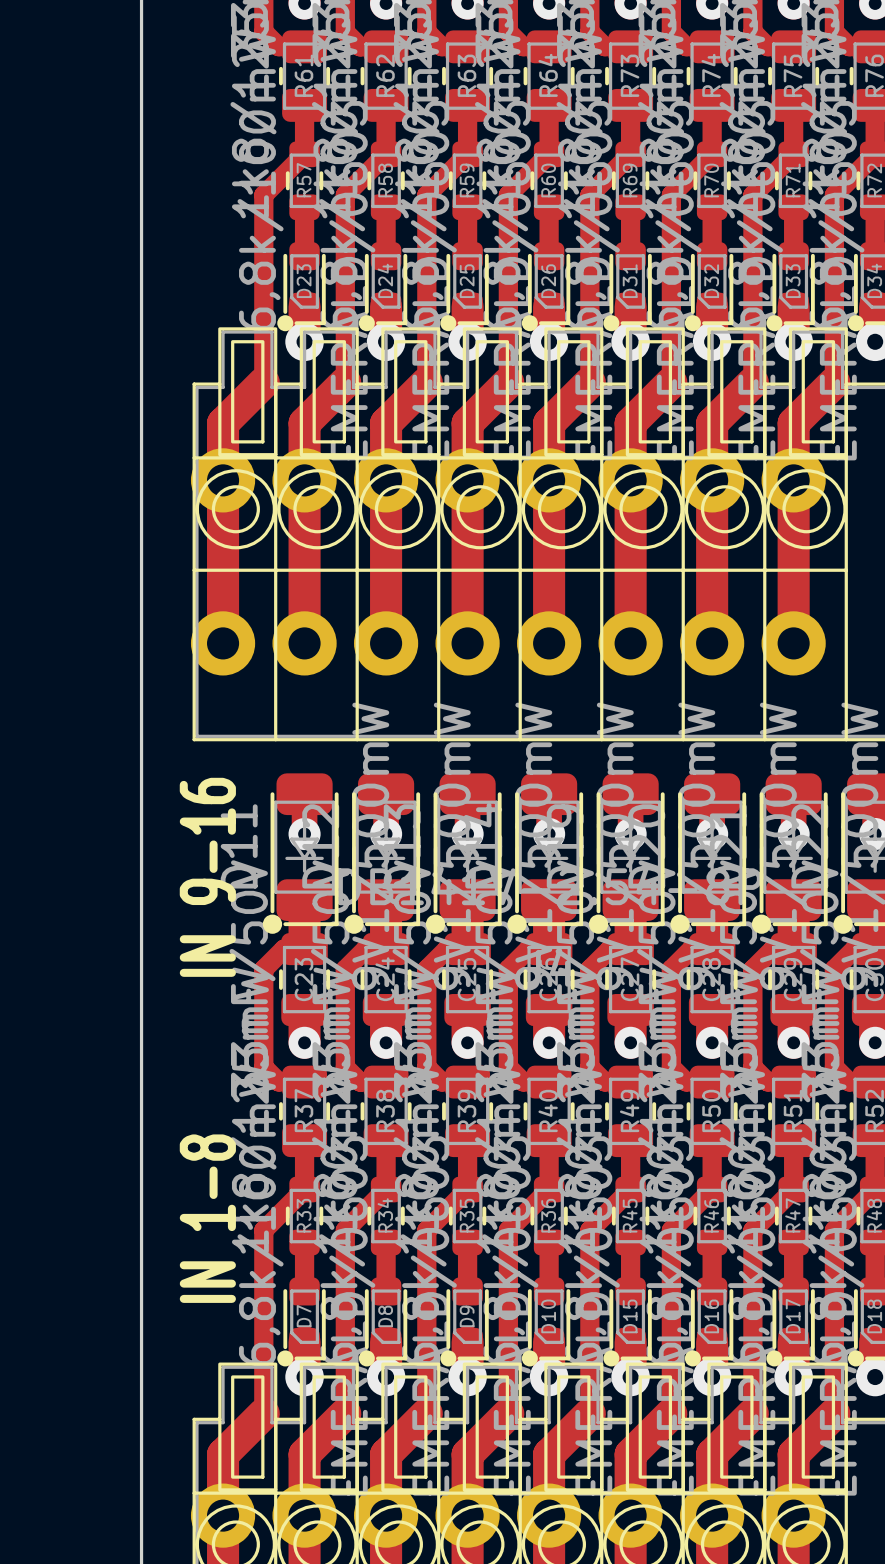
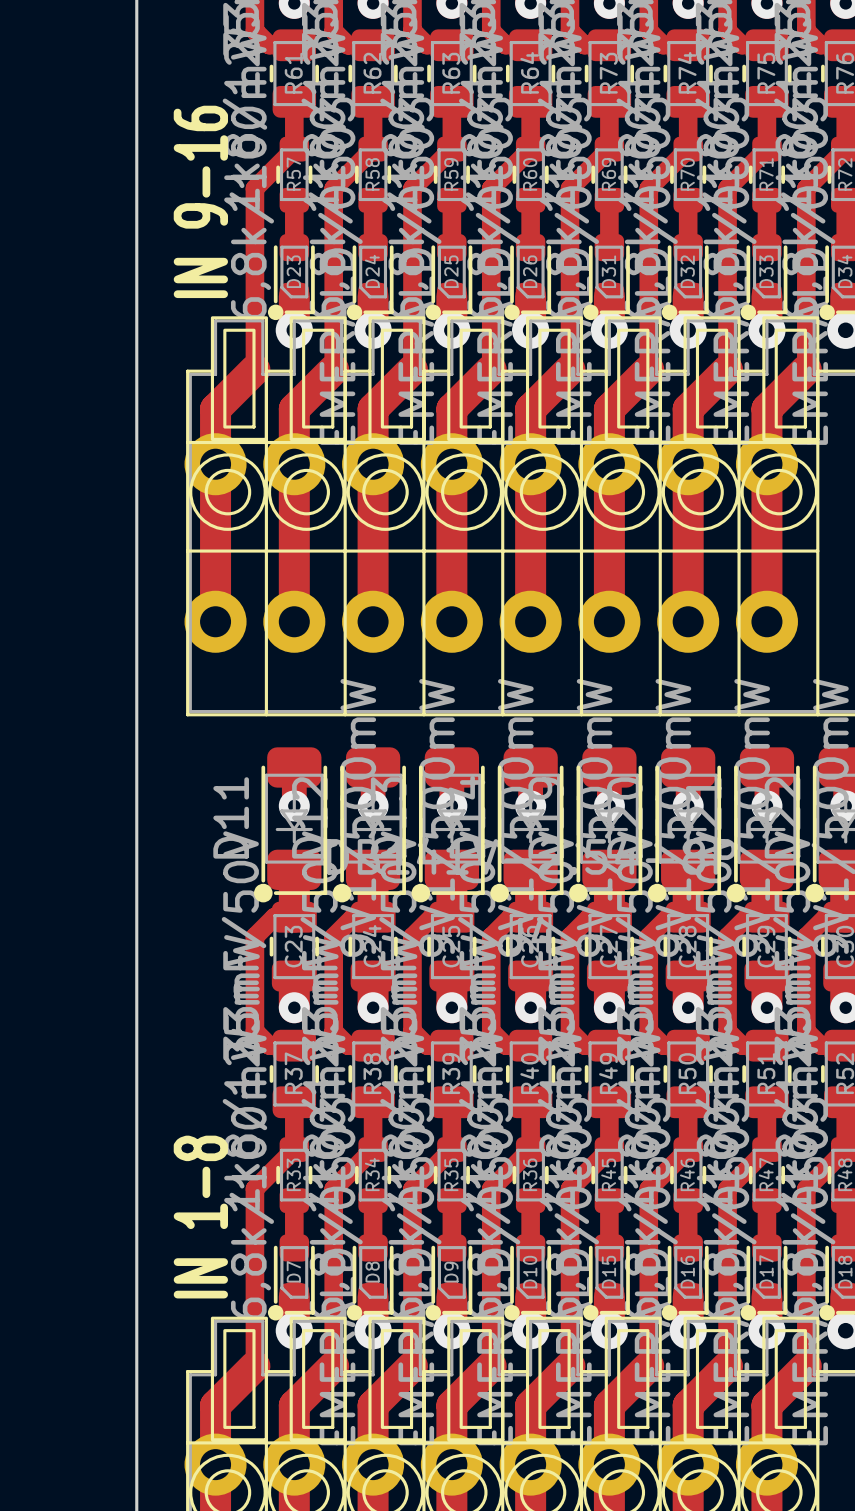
text position: IN 9-16 (207, 877) -> IN 9-16 (200, 201)
text position: IN 1-8 (207, 1218) -> IN 1-8 (200, 1217)

